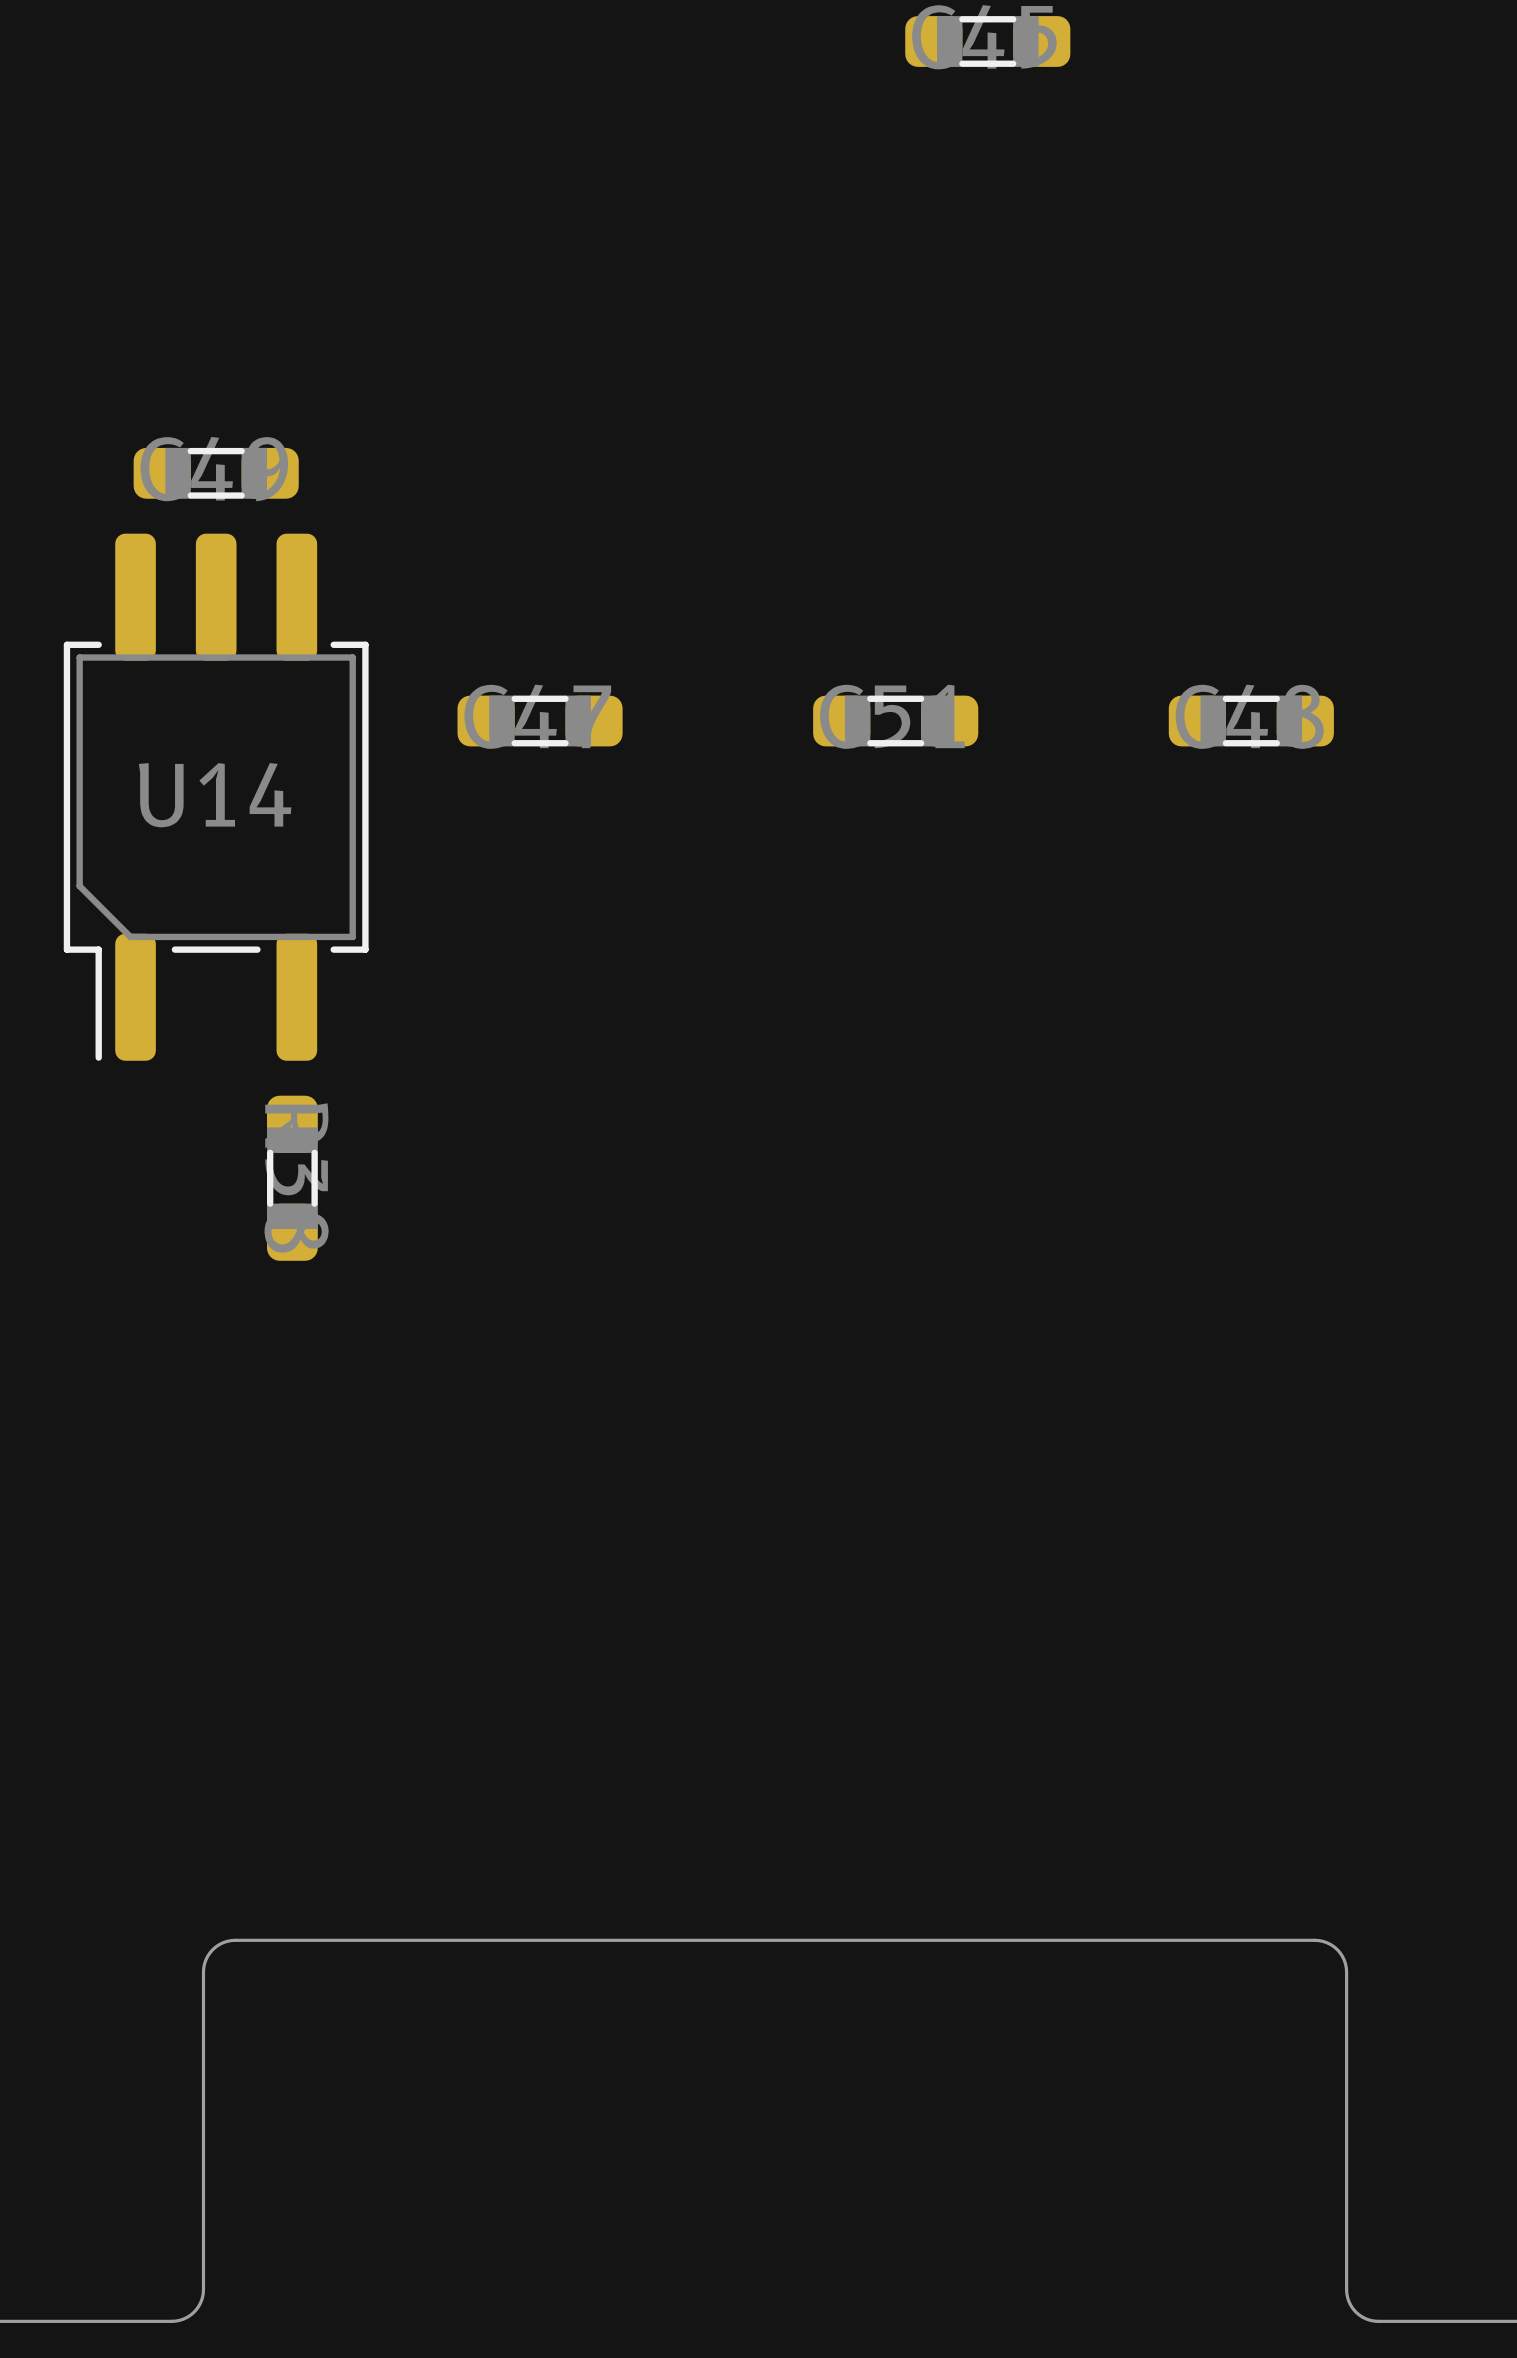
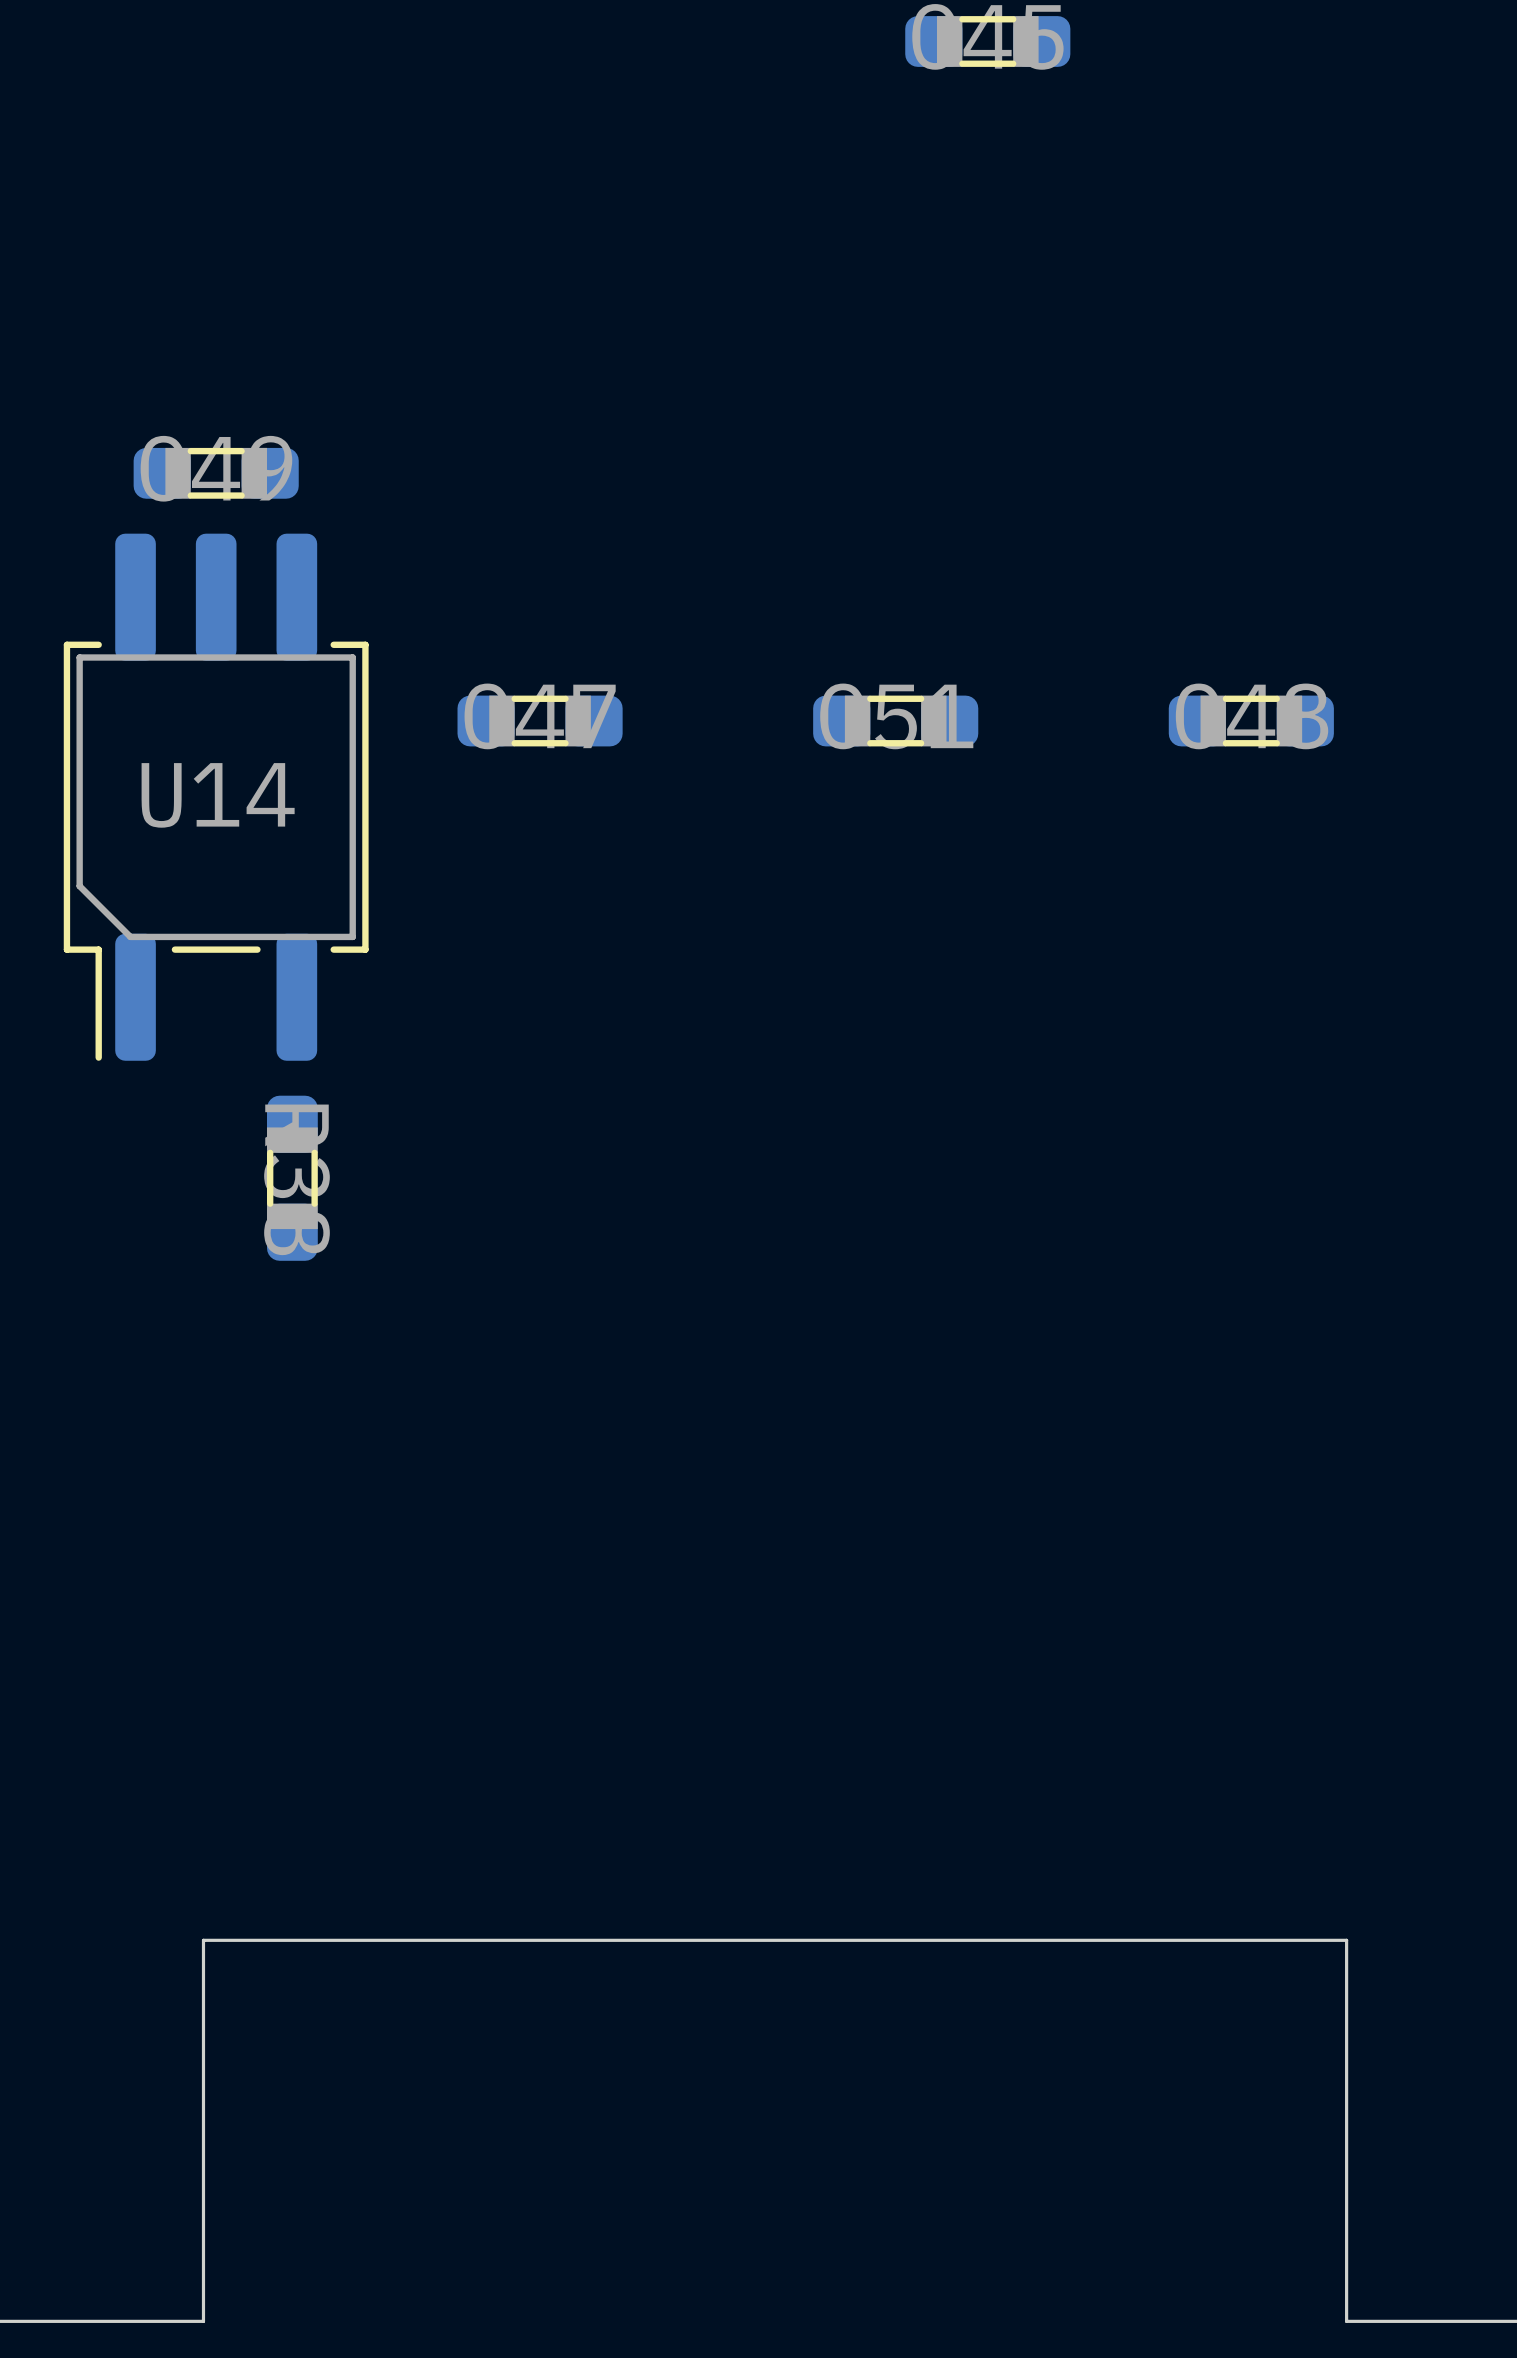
board edge: (235, 1940) (223, 1942) (212, 1949) (205, 1959) (203, 1972) -> (235, 1940) (203, 1940) (203, 1972)
board edge: (1314, 1940) (1327, 1942) (1337, 1949) (1344, 1959) (1346, 1972) -> (1314, 1940) (1346, 1940) (1346, 1972)
board edge: (203, 2289) (201, 2301) (194, 2312) (183, 2318) (171, 2321) -> (203, 2289) (203, 2321) (171, 2321)
board edge: (1346, 2289) (1349, 2301) (1355, 2312) (1366, 2318) (1378, 2321) -> (1346, 2289) (1346, 2321) (1378, 2321)

